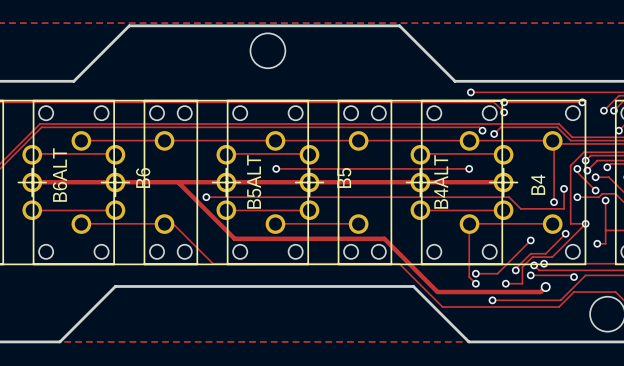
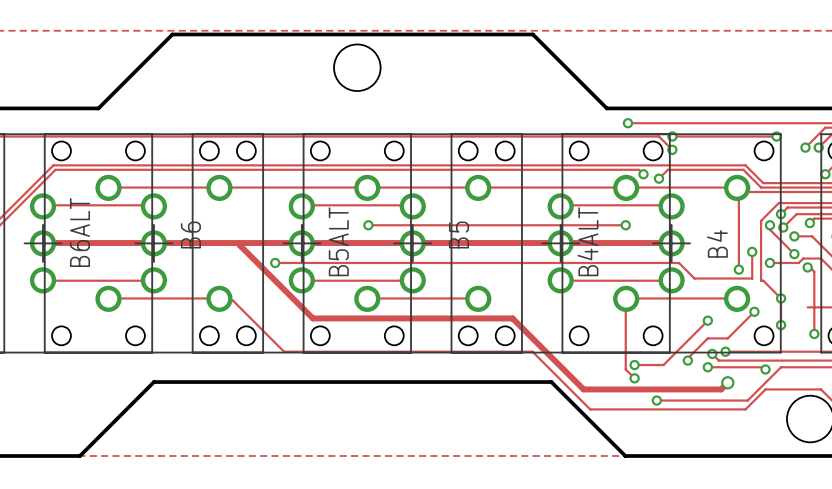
track: (605, 200) (605, 243) (597, 243) -> none
track: none -> (809, 267) (814, 271) (814, 333)
track: (570, 210) (570, 223) (585, 223) (552, 257) (532, 257) (522, 267) (522, 283) (505, 283) -> (761, 280) (781, 298) (781, 325)
via: none -> (781, 325)
via: (597, 243) -> none
via: none -> (814, 333)
via: (505, 283) -> none

